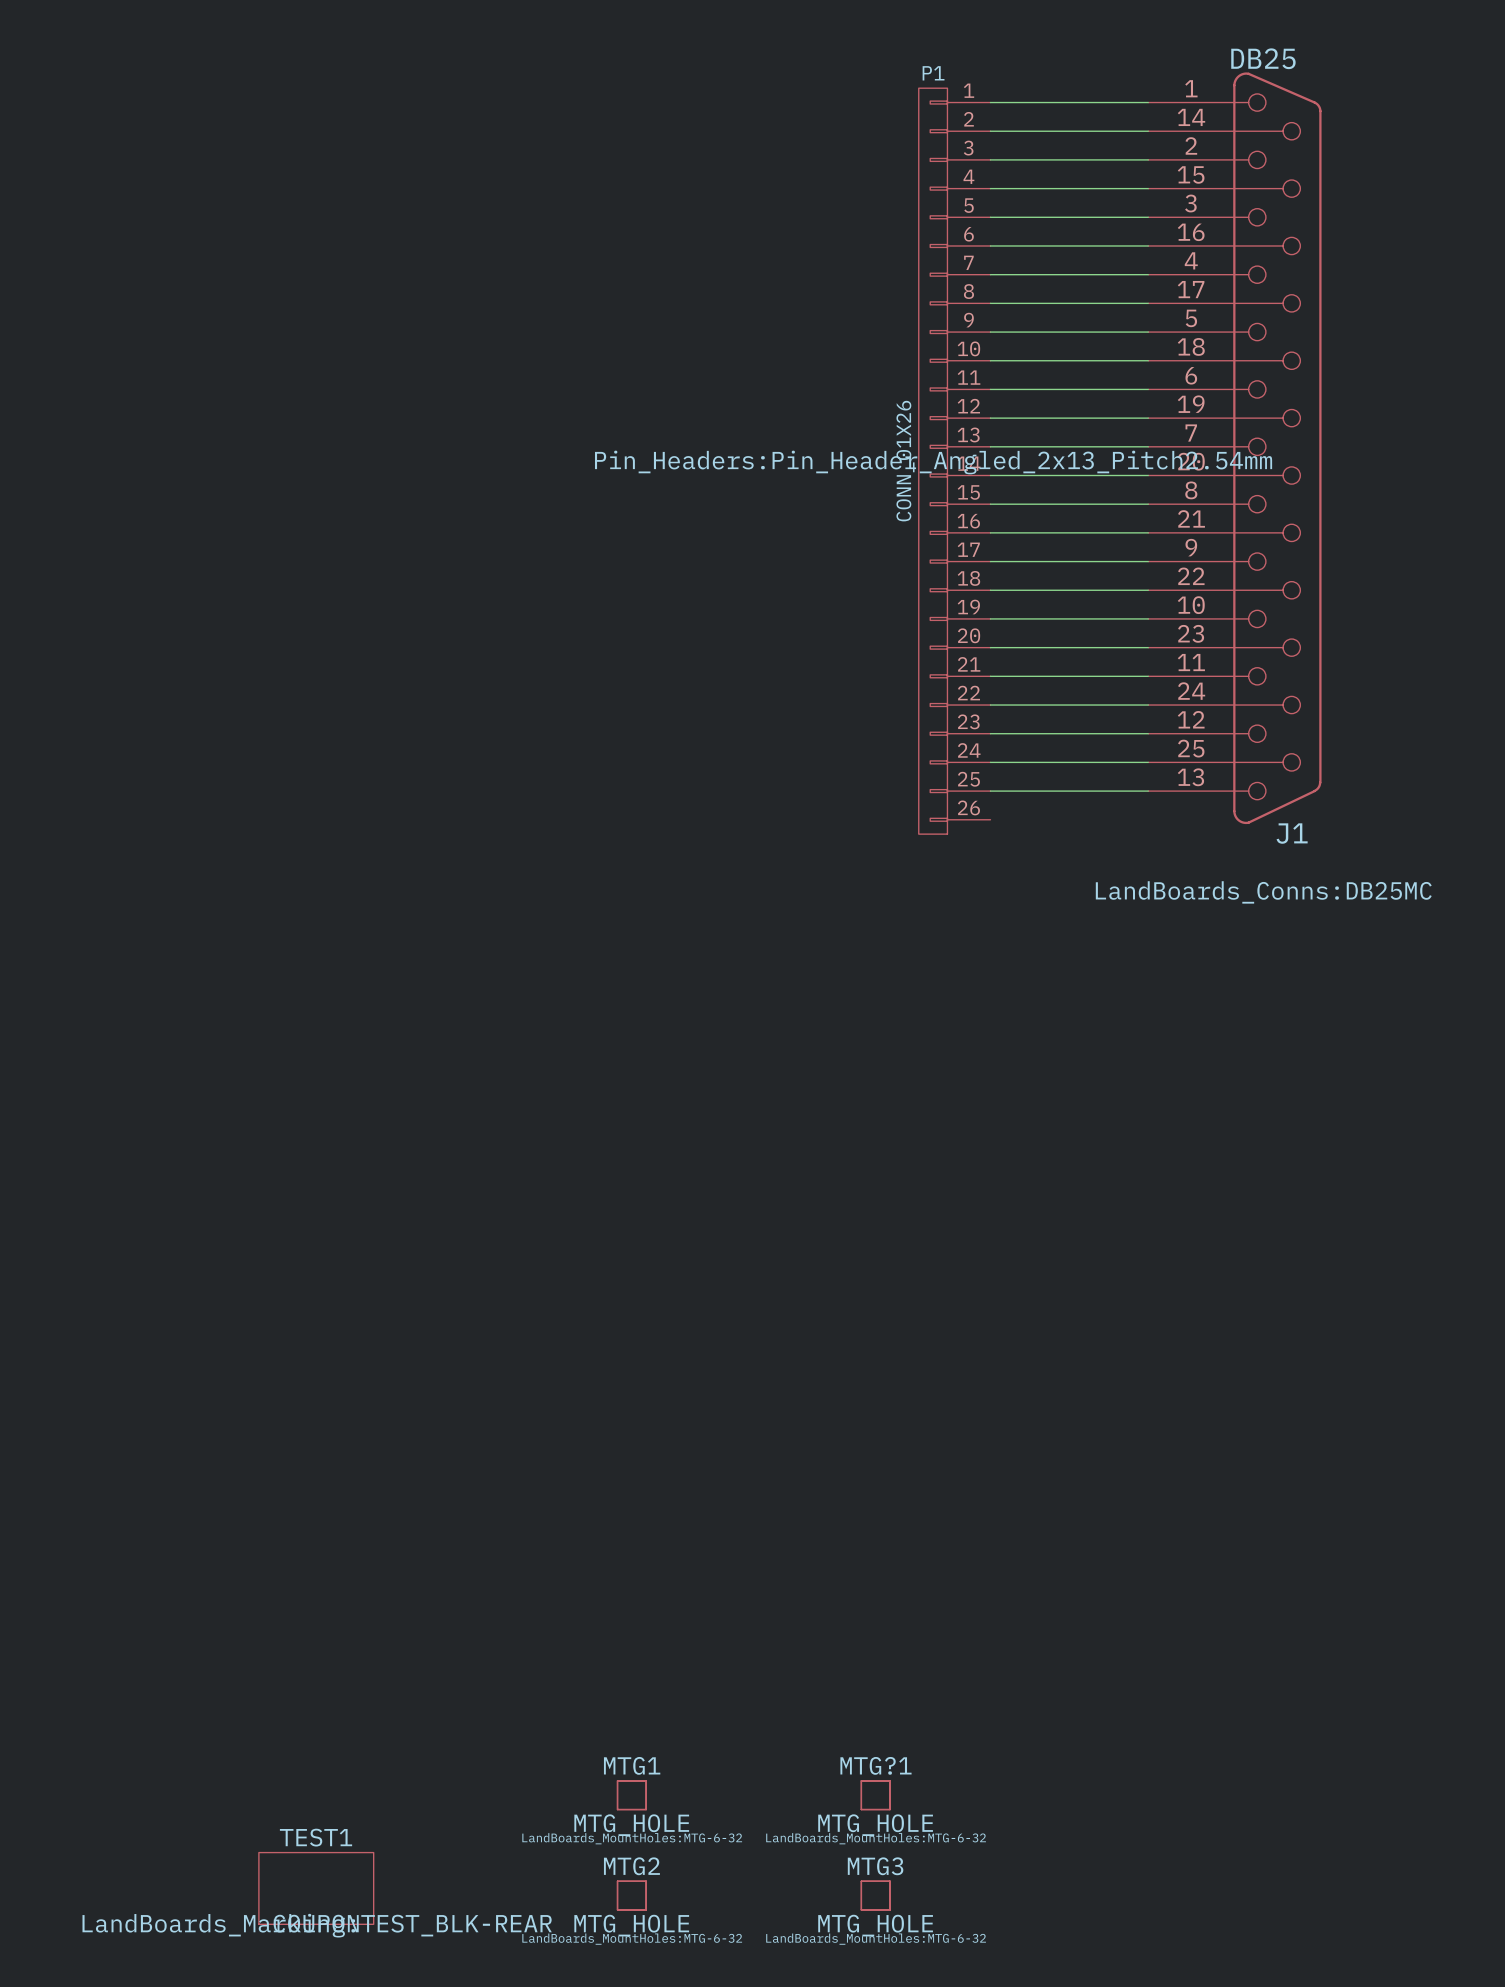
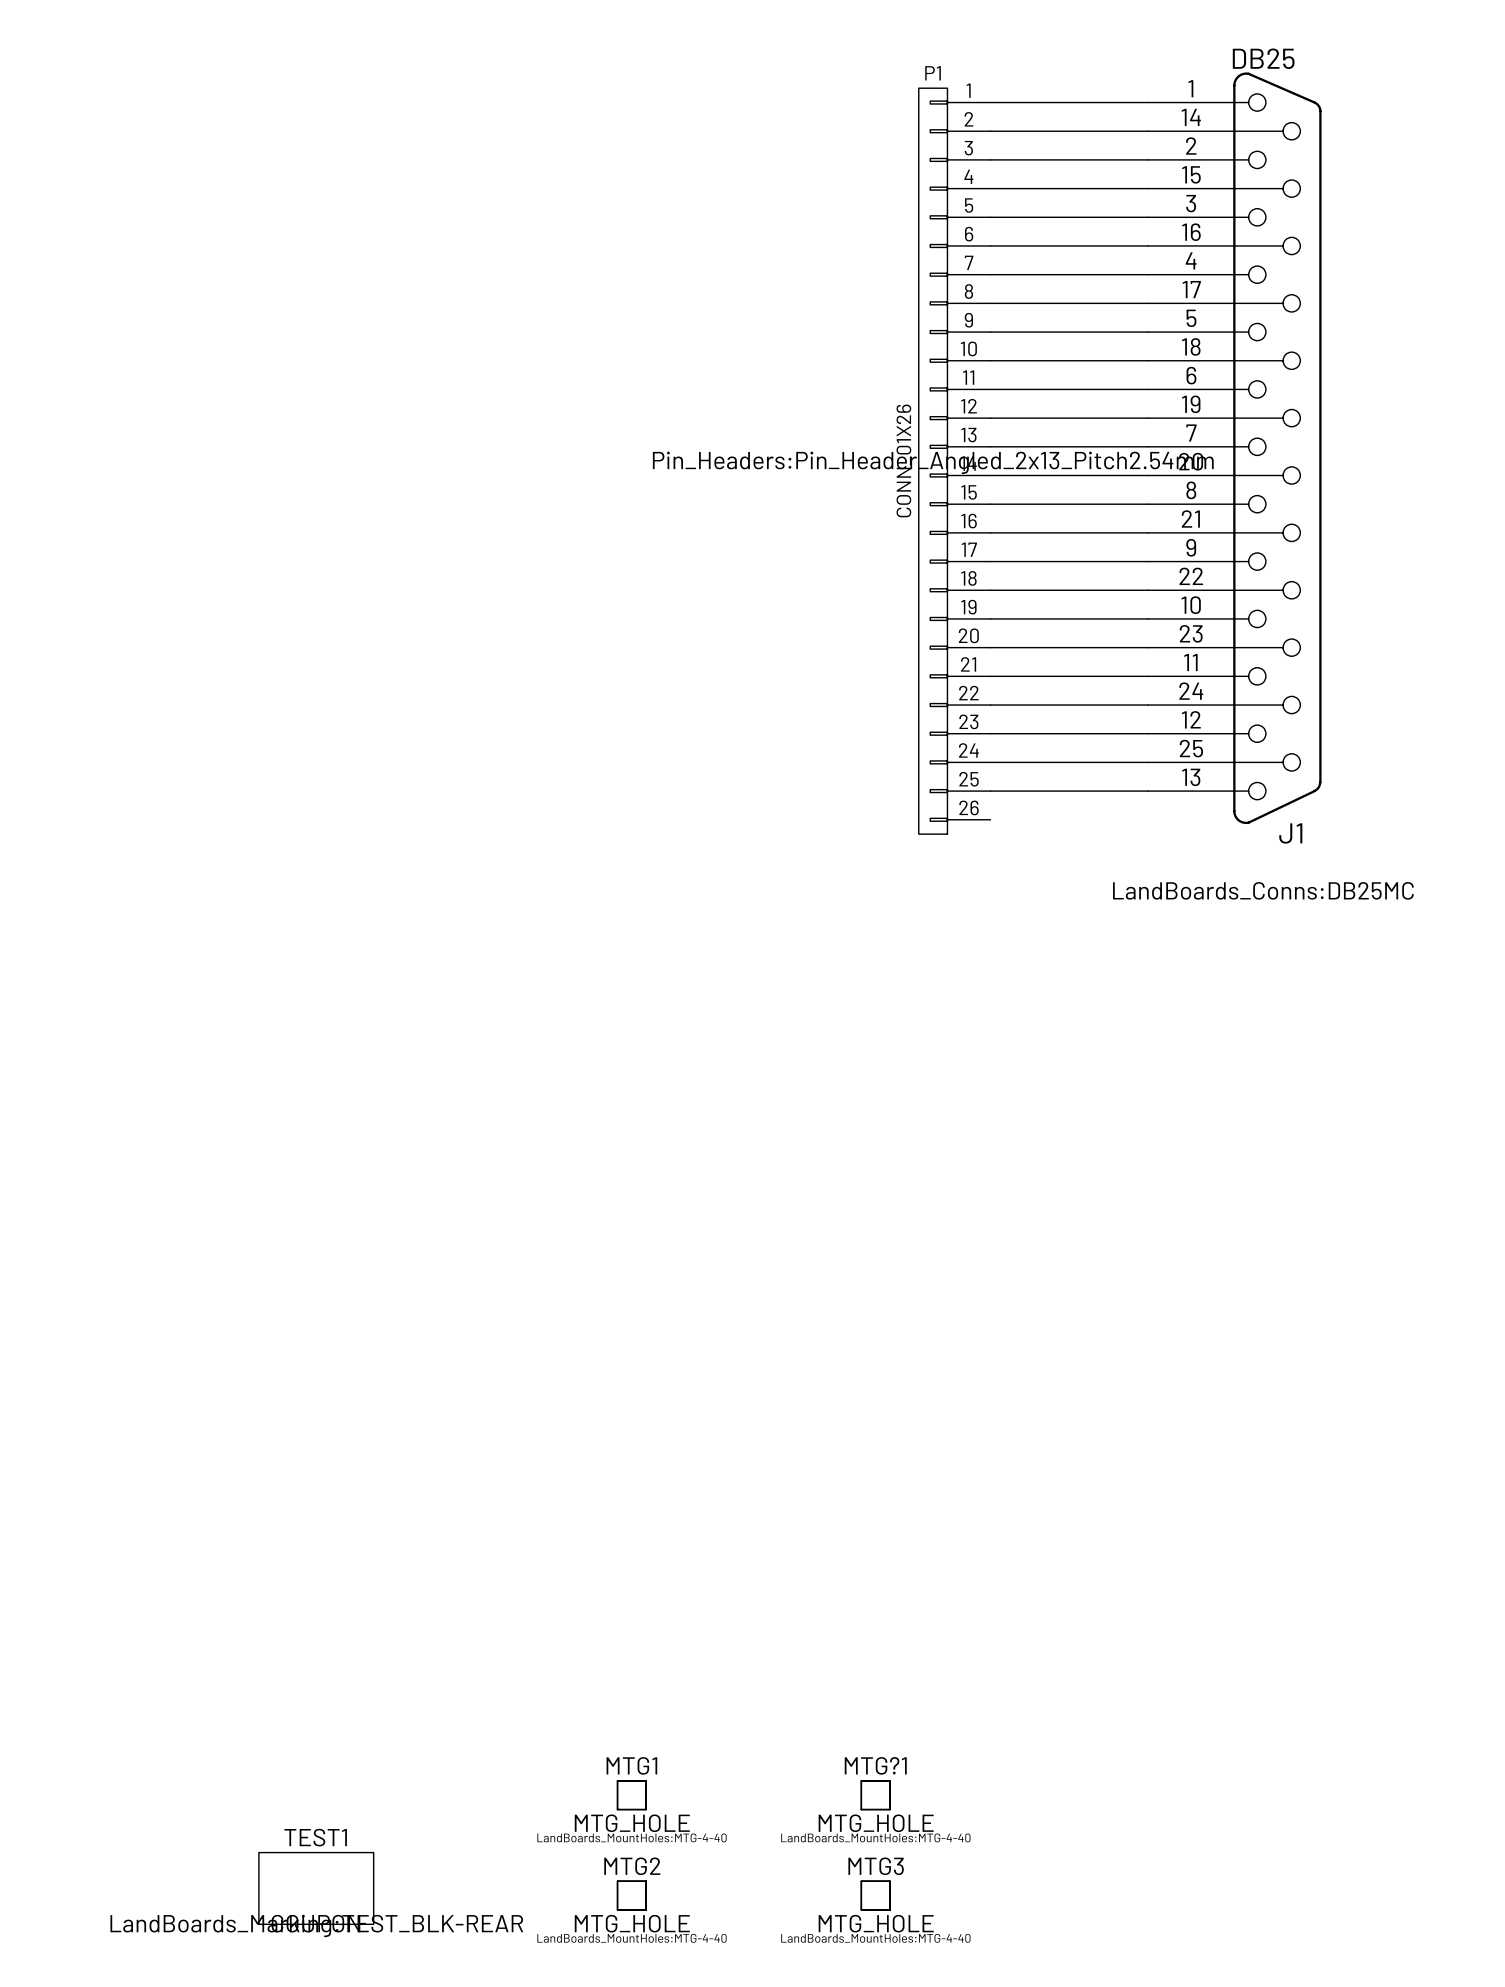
MTG1 text: LandBoards_MountHoles:MTG-6-32 (632, 1838) -> LandBoards_MountHoles:MTG-4-40 (632, 1837)
MTG?1 text: LandBoards_MountHoles:MTG-6-32 (876, 1838) -> LandBoards_MountHoles:MTG-4-40 (875, 1837)
MTG2 text: LandBoards_MountHoles:MTG-6-32 (632, 1939) -> LandBoards_MountHoles:MTG-4-40 (632, 1938)
MTG3 text: LandBoards_MountHoles:MTG-6-32 (876, 1939) -> LandBoards_MountHoles:MTG-4-40 (875, 1938)

